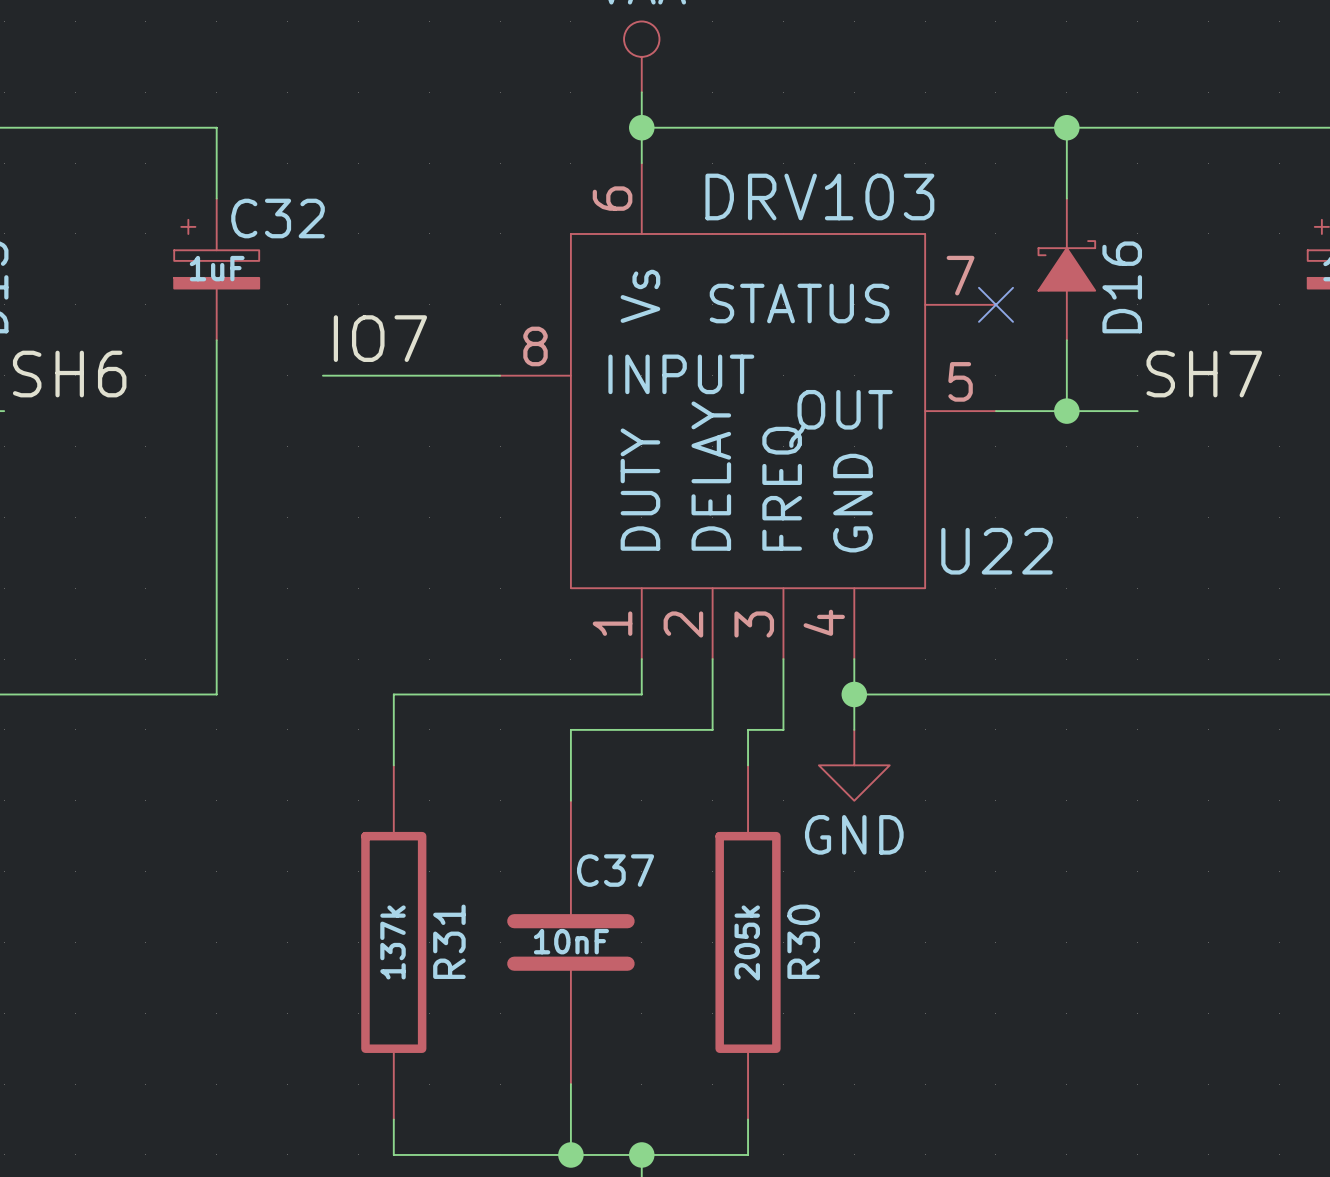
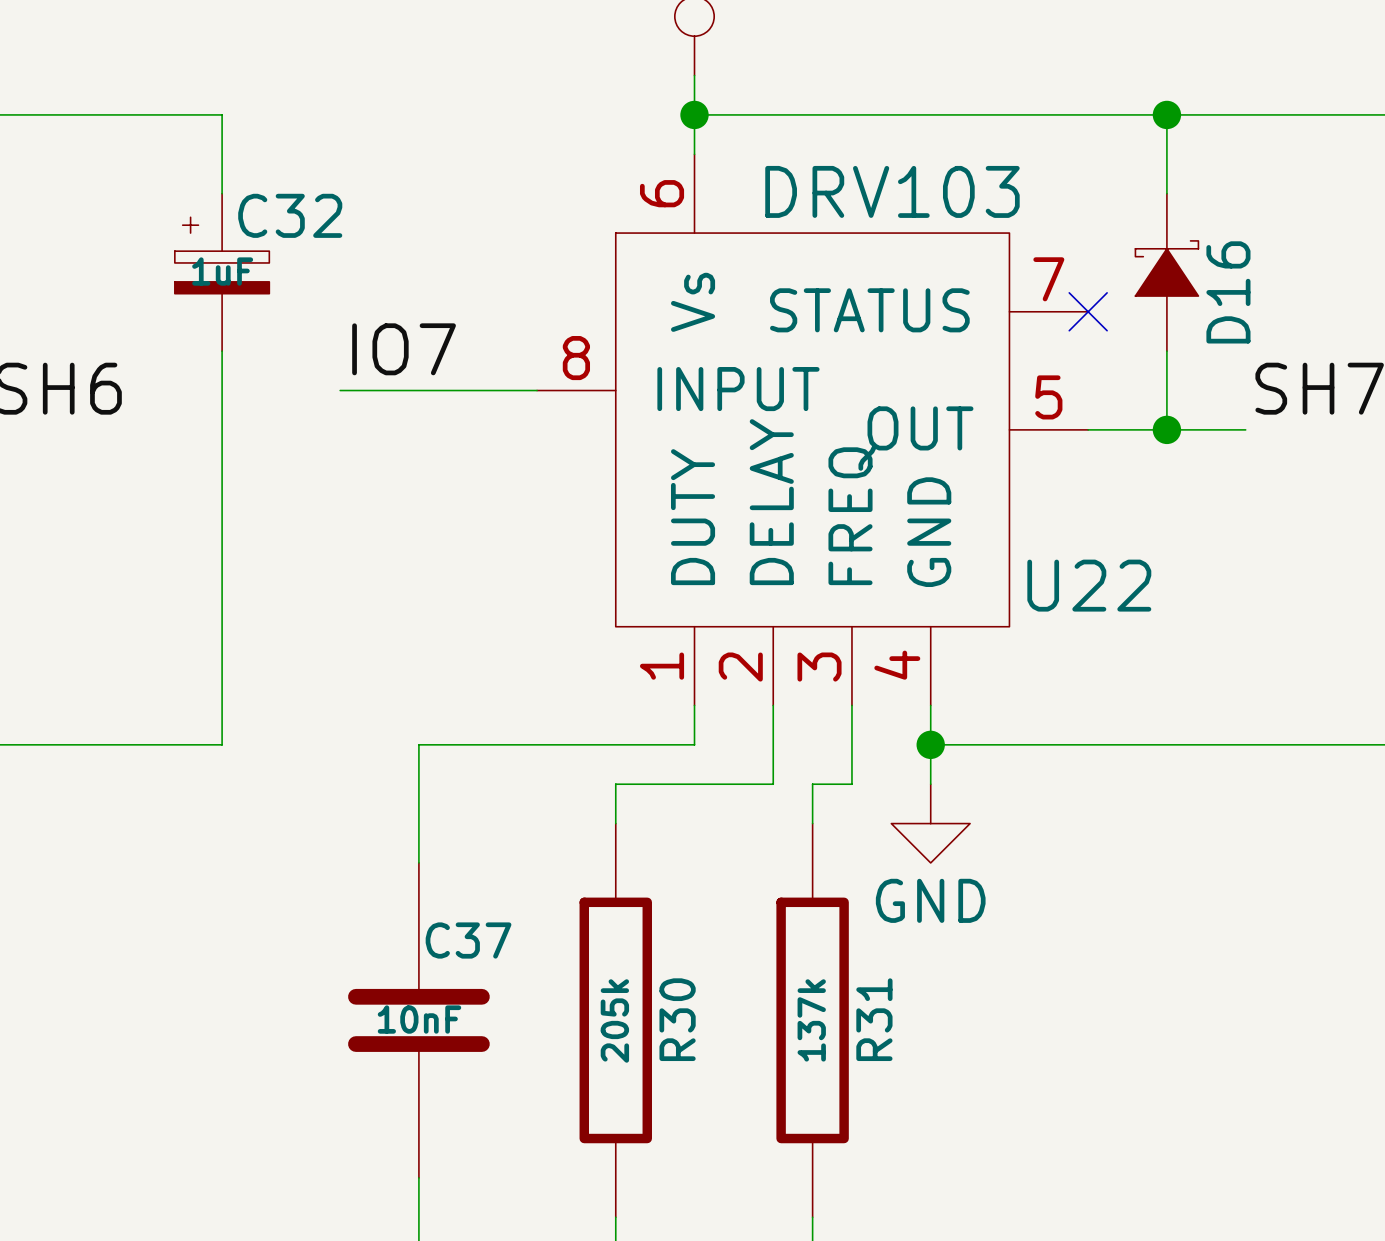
R30 name: R30 (803, 941) -> R31 (874, 1019)
R31: 137k (393, 942) -> none
C37 position: (570, 942) -> (418, 1020)
R30: none -> 205k (615, 1020)
R30 value: 205k (747, 942) -> 137k (811, 1020)

